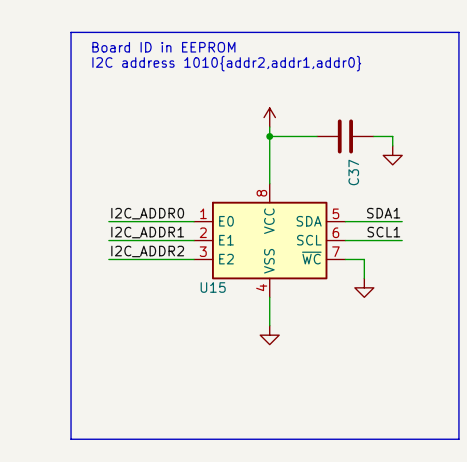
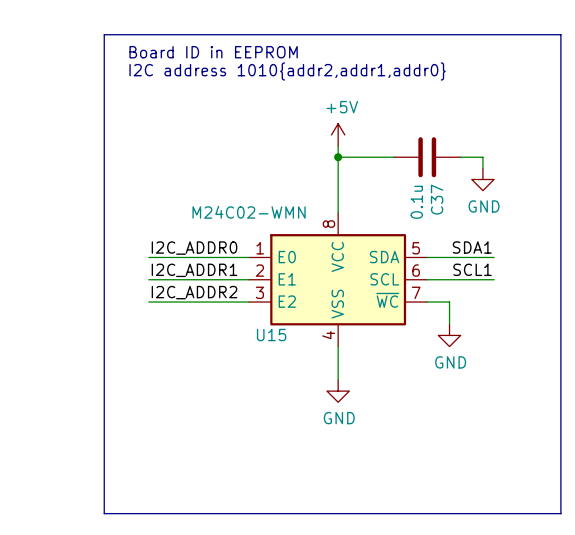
power symbol text: none -> +5V (342, 107)
C37 value: none -> 0.1u (416, 202)
power symbol text: none -> GND (484, 206)
U15 value: none -> M24C02-WMN (249, 212)
power symbol text: none -> GND (450, 362)
power symbol text: none -> GND (339, 418)

